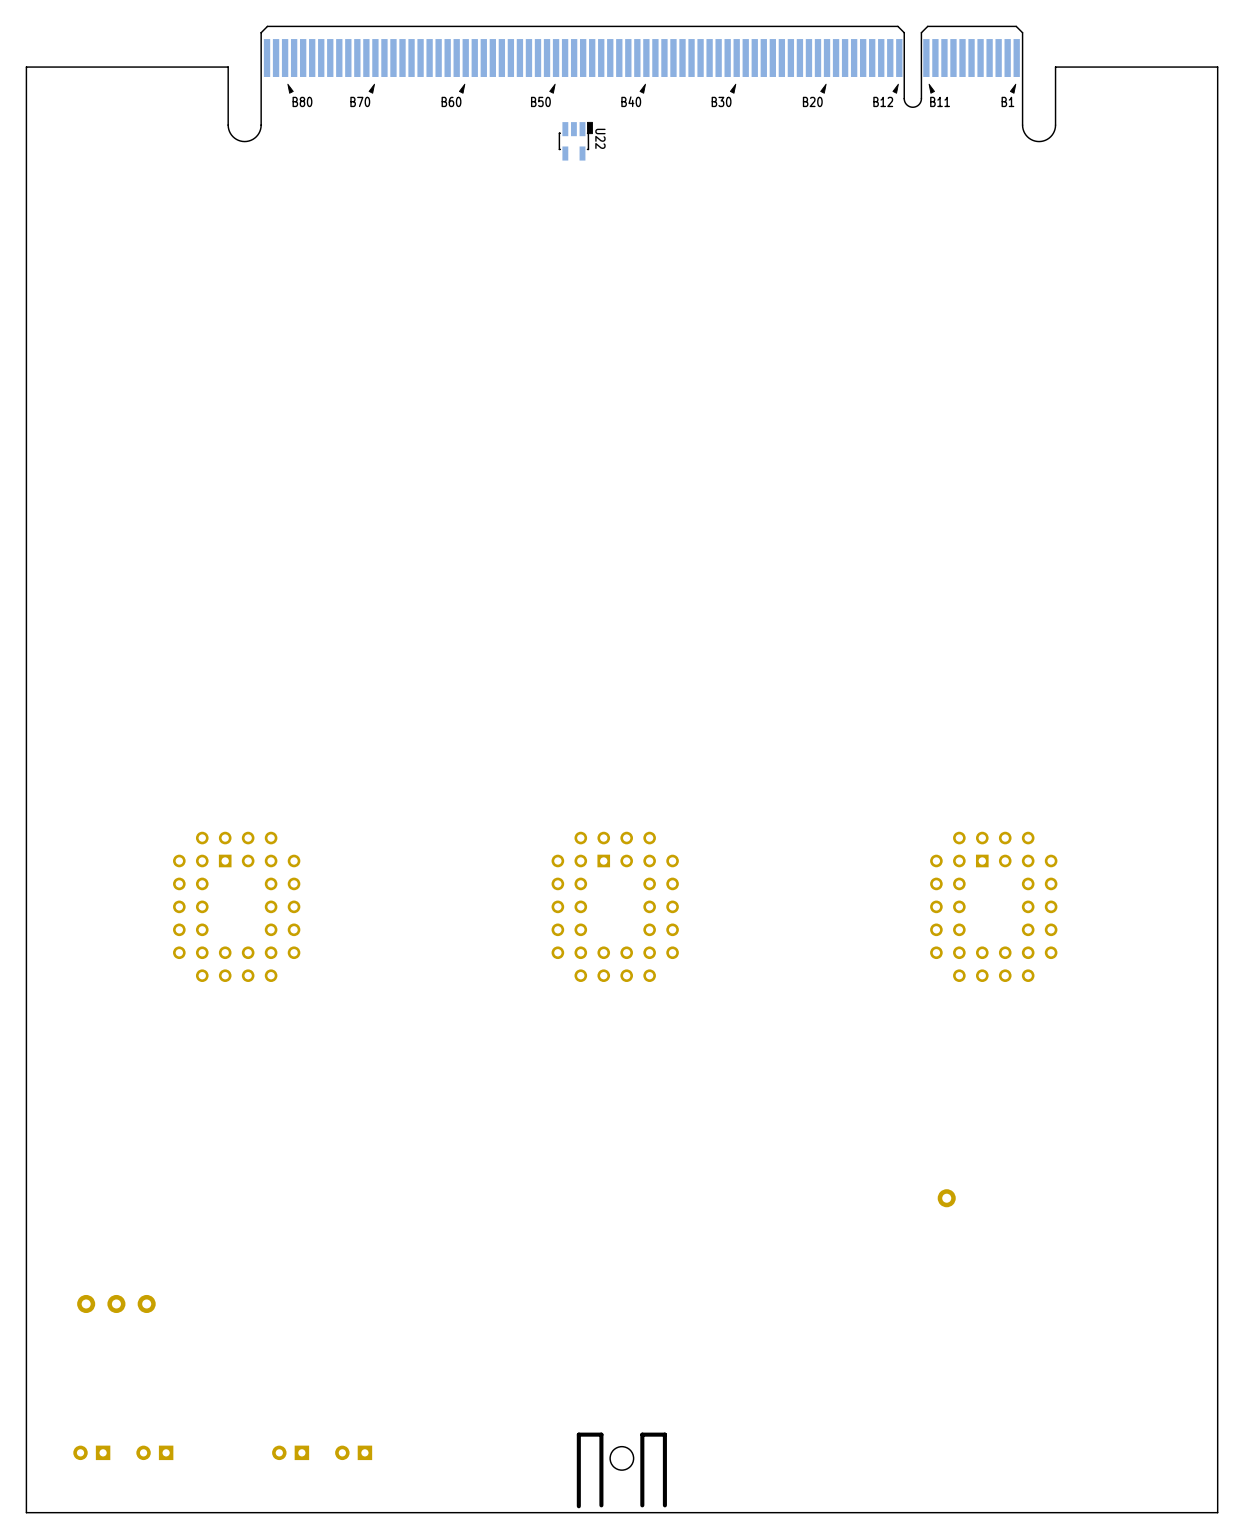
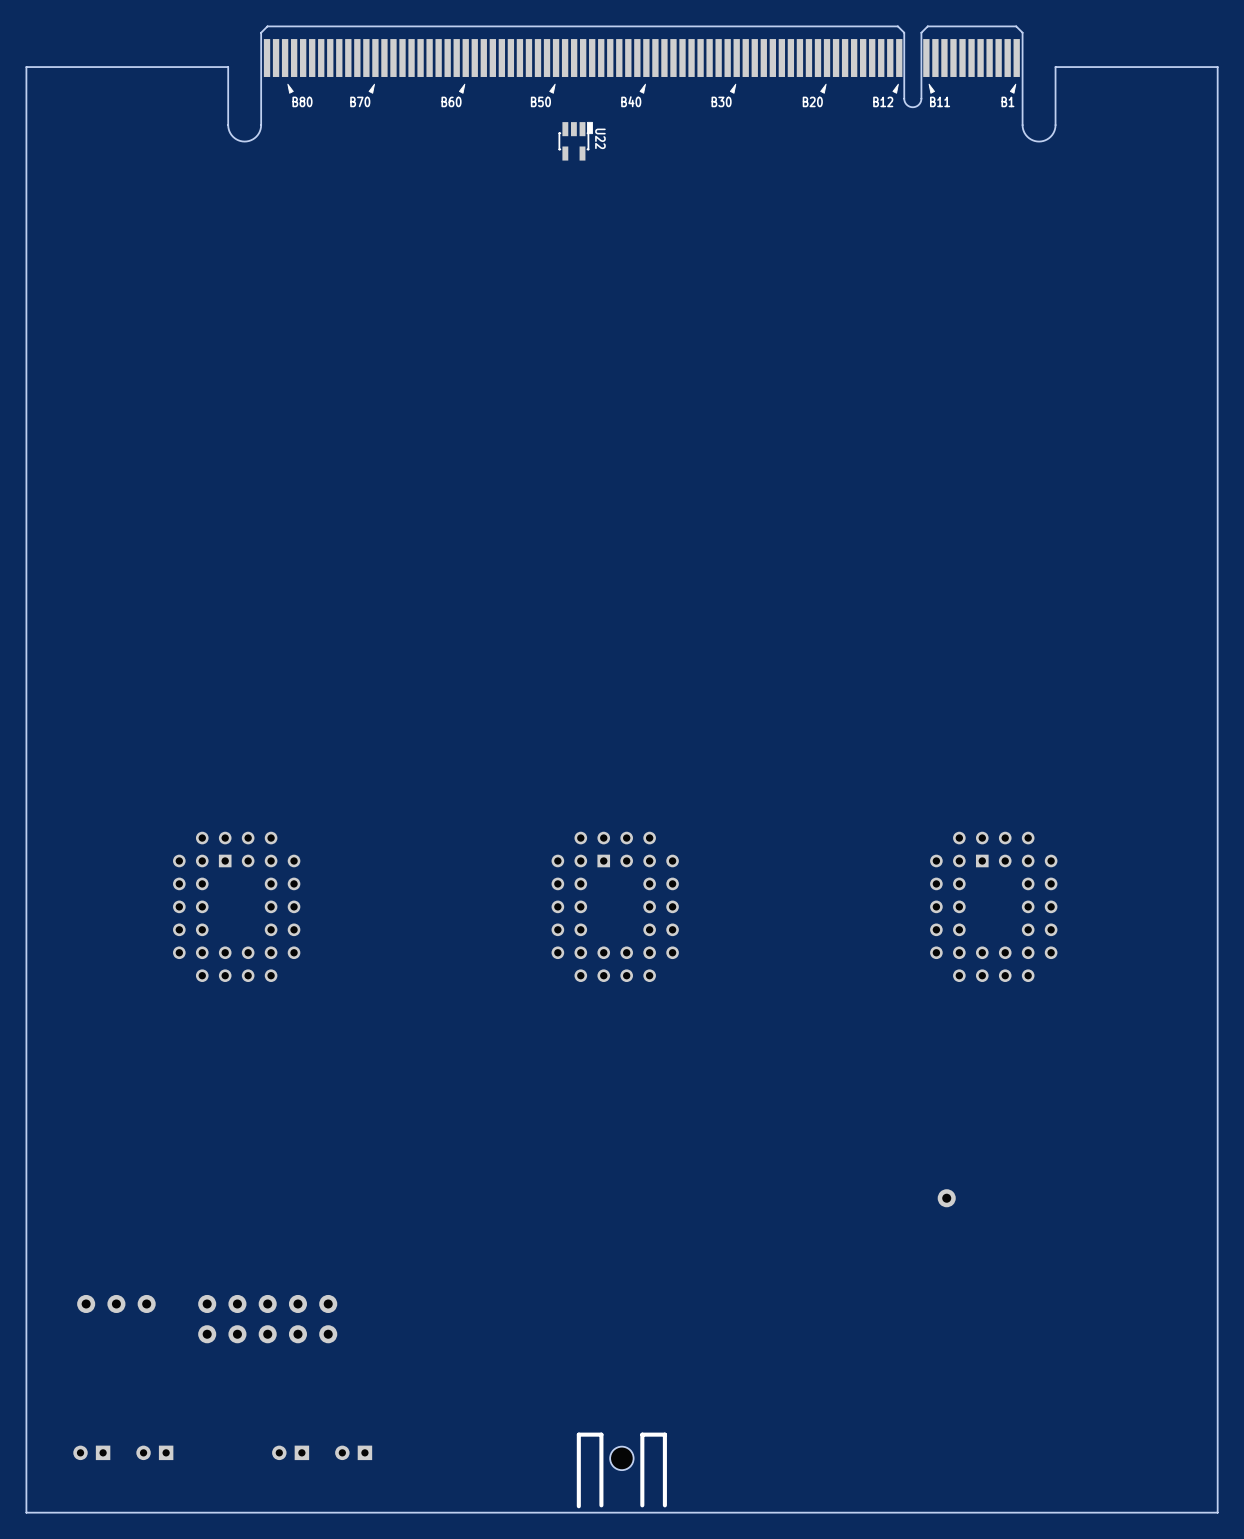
part: none -> (207, 1303)
part: none -> (237, 1303)
part: none -> (267, 1303)
part: none -> (297, 1303)
part: none -> (328, 1303)
part: none -> (207, 1334)
part: none -> (237, 1334)
part: none -> (267, 1334)
part: none -> (297, 1334)
part: none -> (328, 1334)

